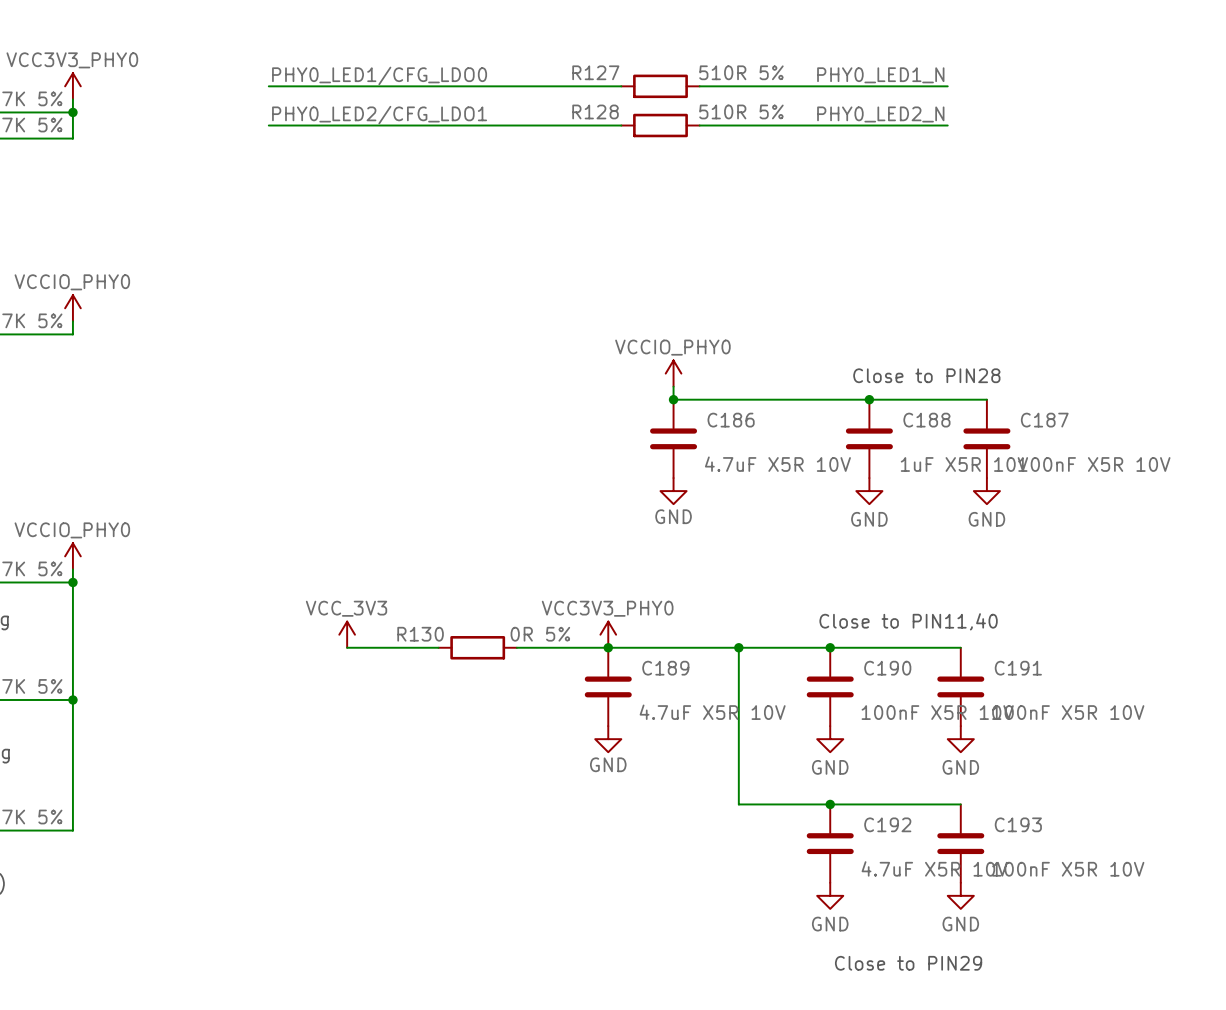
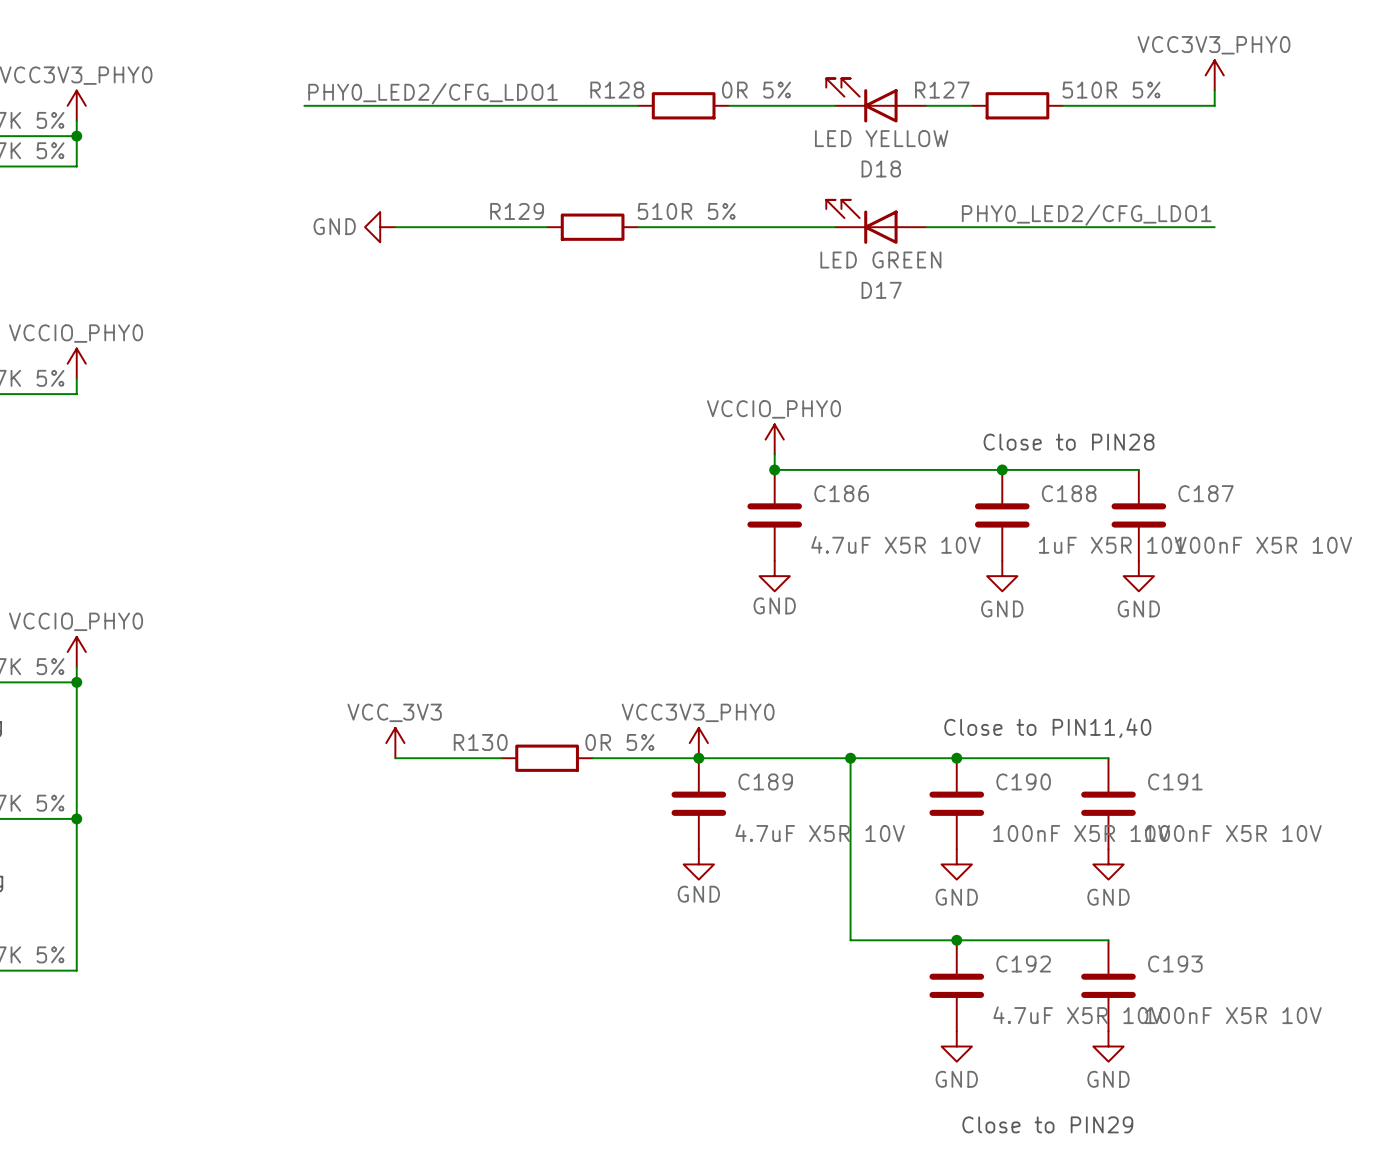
power symbol: none -> VCC3V3_PHY0 (1214, 75)
wire: none -> (1214, 90) (1214, 105) (1093, 105)
label: PHY0_LED1/CFG_LDO0 (379, 75) -> PHY0_LED2/CFG_LDO1 (433, 93)
label: PHY0_LED1_N (880, 75) -> none
D18: none -> LED YELLOW (876, 100)
wire: (556, 86) (621, 86) -> (729, 105) (805, 105)
R127 position: (660, 86) -> (1017, 105)
wire: (843, 86) (921, 86) -> none
R128 name position: R128 (595, 111) -> R128 (617, 90)
R128 value: 510R 5% (741, 111) -> 0R 5% (756, 90)
label: PHY0_LED2_N (880, 114) -> none
label: PHY0_LED2/CFG_LDO1 (379, 115) -> none
wire: (268, 125) (621, 125) -> none
R128 position: (660, 125) -> (683, 105)
wire: (699, 125) (947, 125) -> (926, 227) (1214, 227)
label: none -> PHY0_LED2/CFG_LDO1 (1086, 215)
D17: none -> LED GREEN (876, 221)
power symbol: none -> GND (380, 227)
wire: none -> (395, 227) (547, 227)
R129: none -> 510R 5% (592, 227)
wire: none -> (638, 227) (835, 227)

